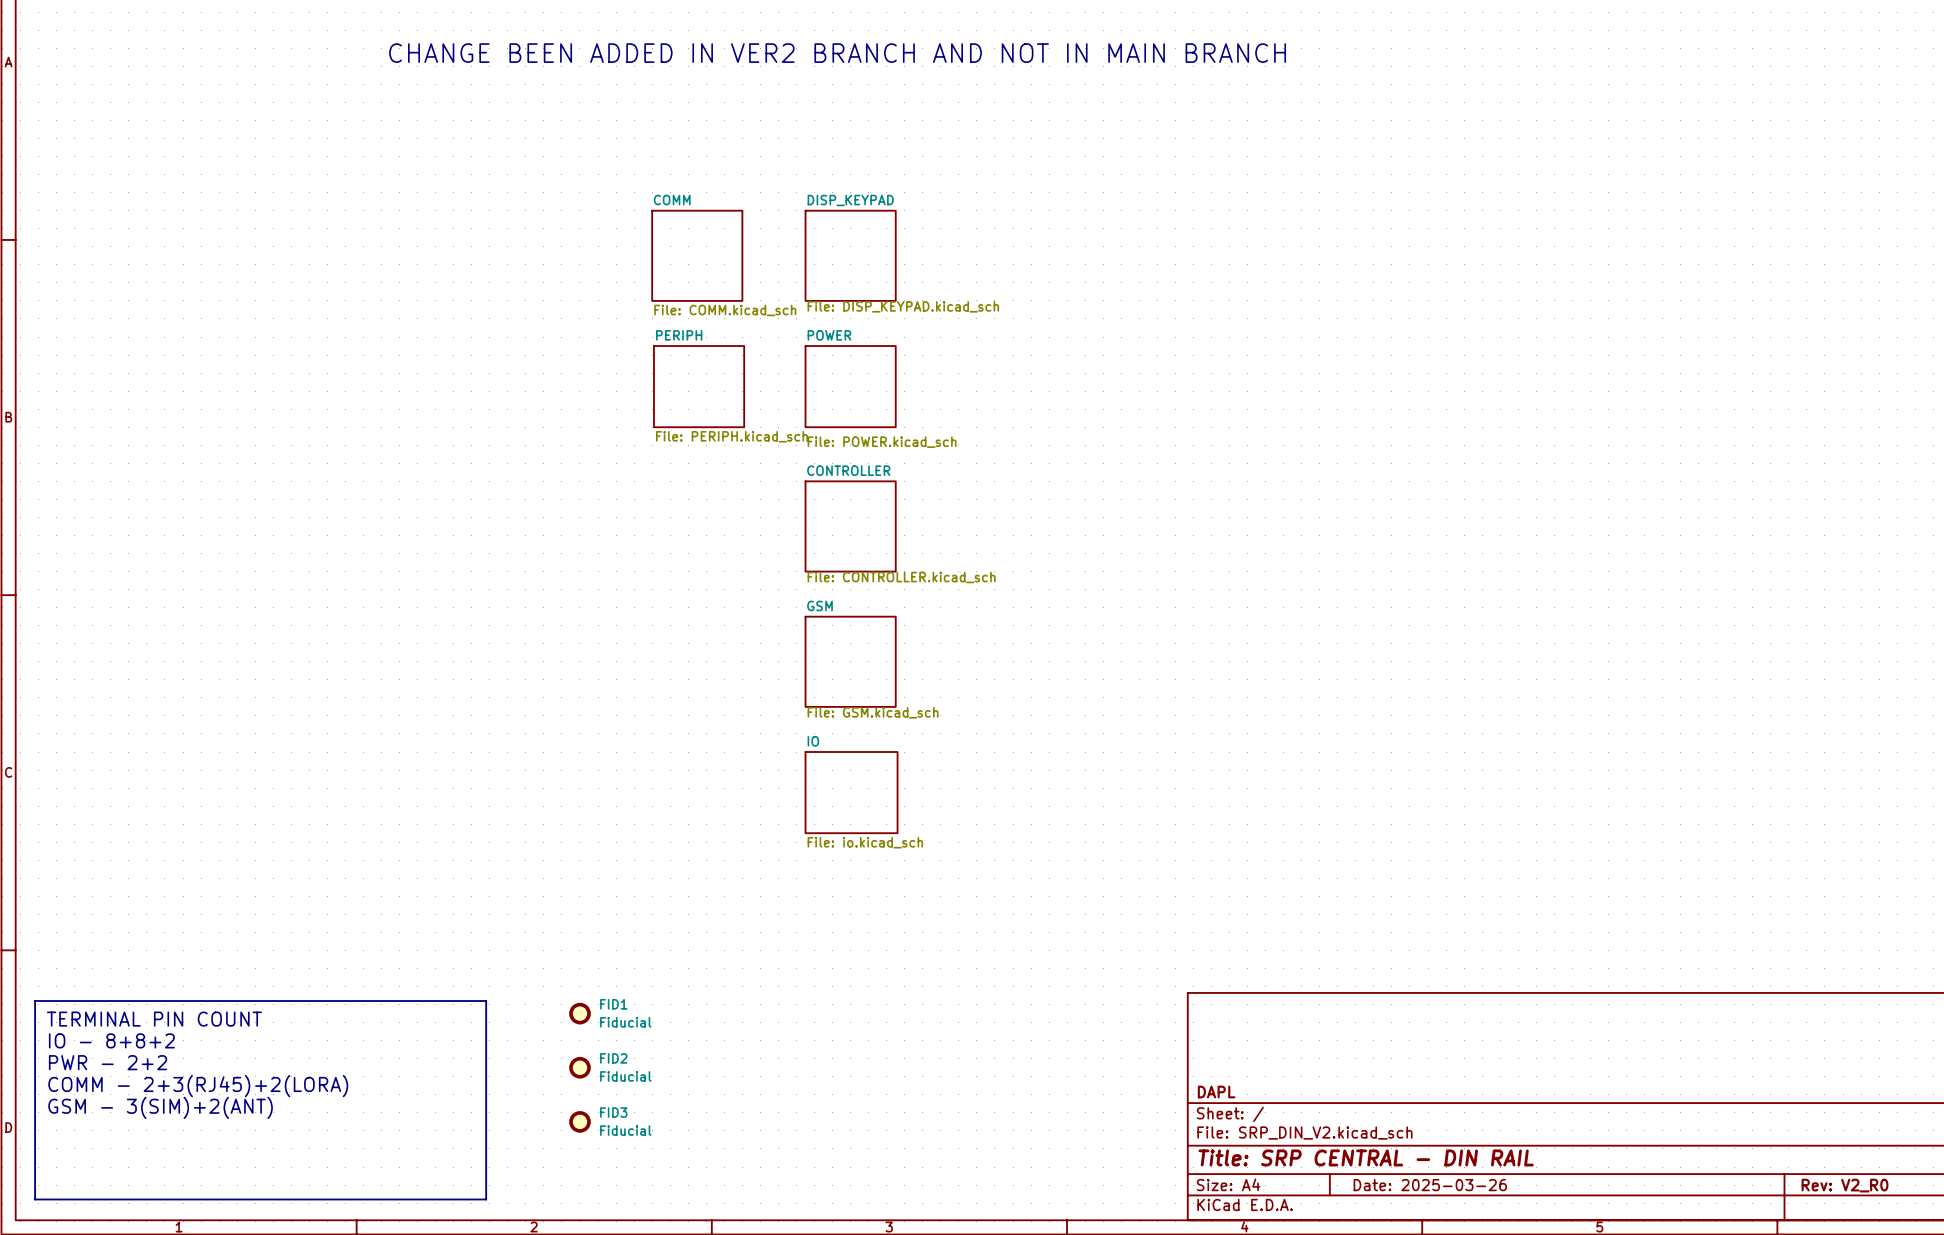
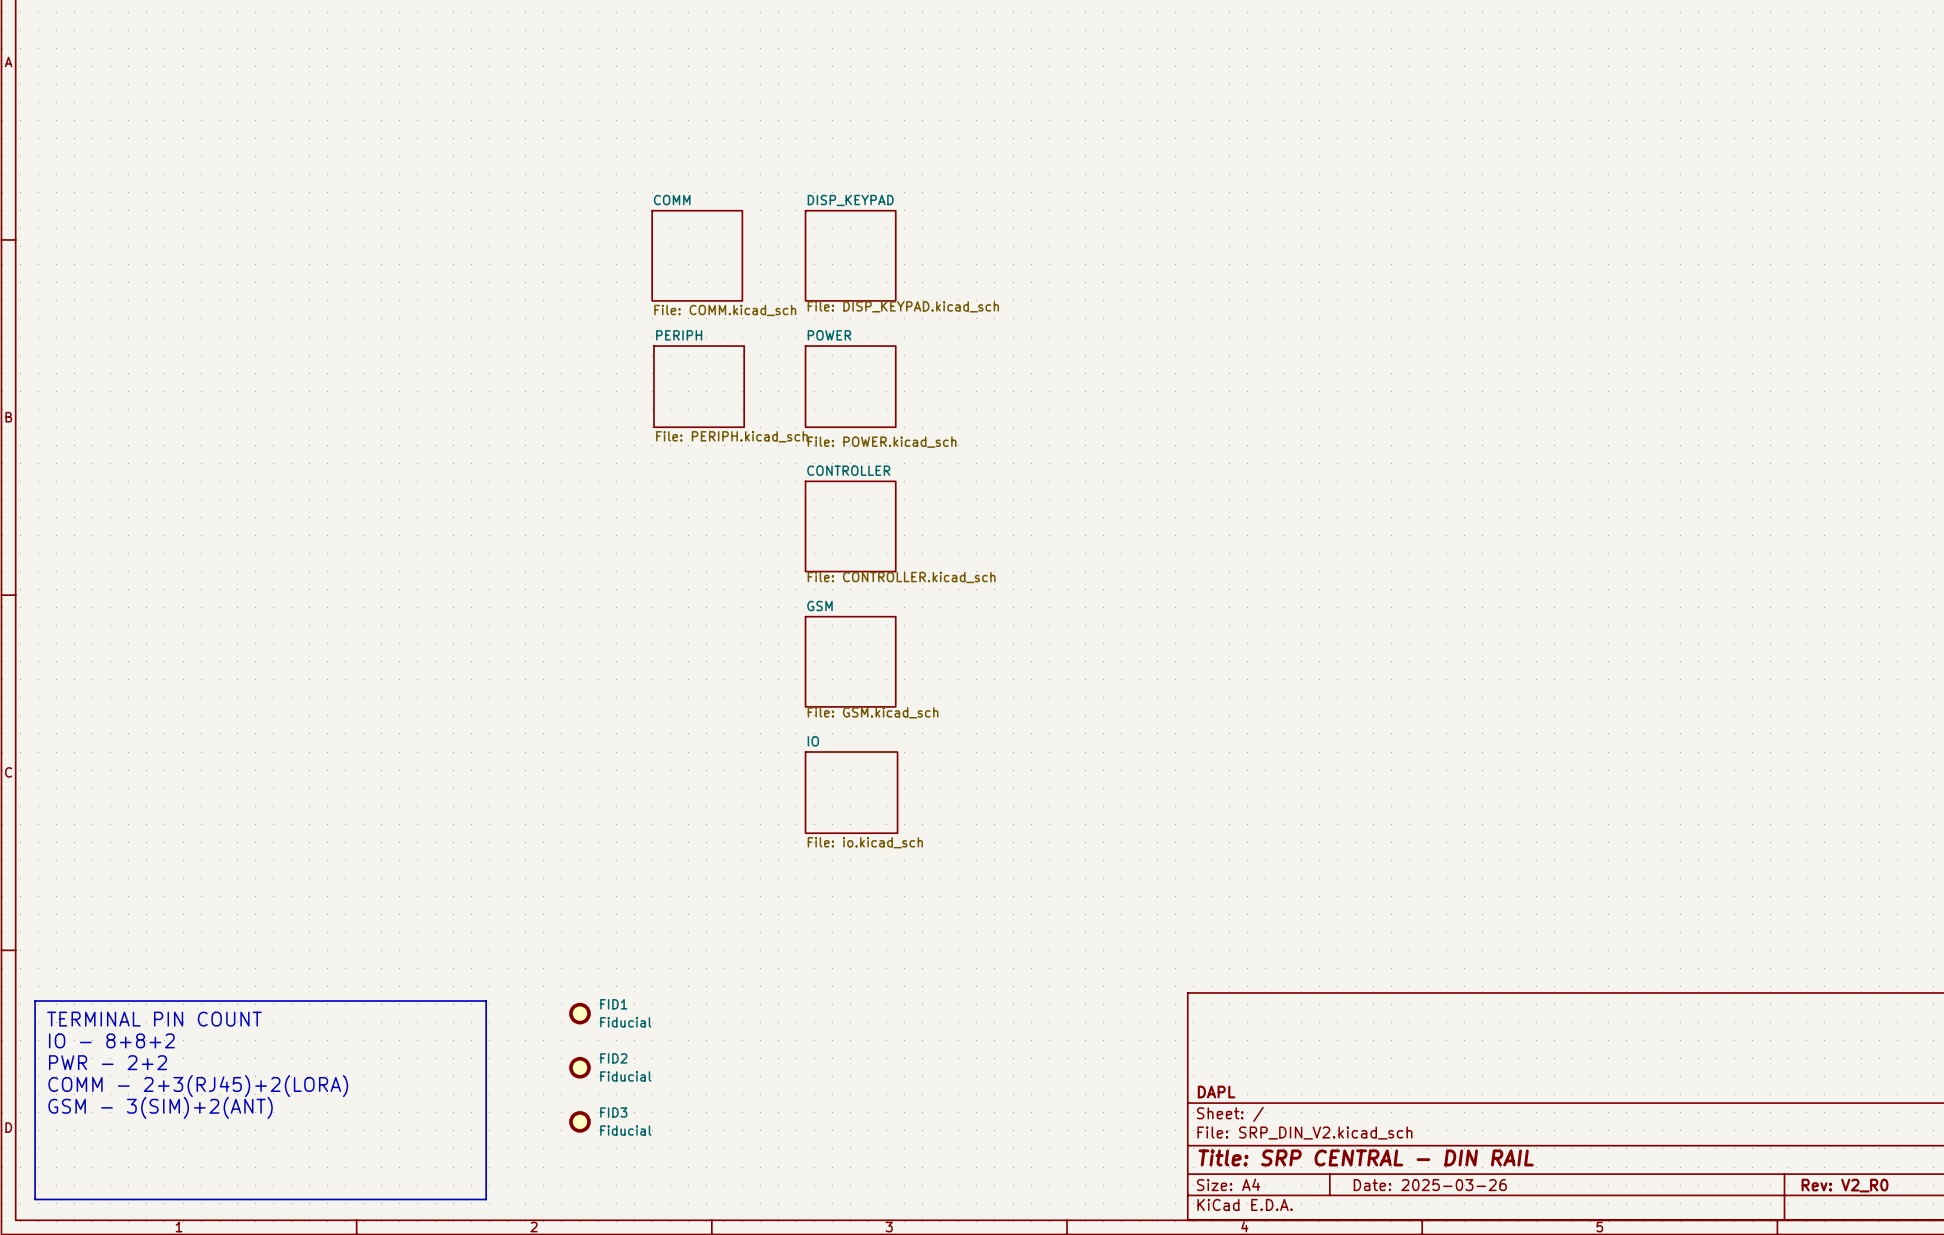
text: CHANGE BEEN ADDED IN VER2 BRANCH AND NOT IN MAIN BRANCH (837, 53) -> none

